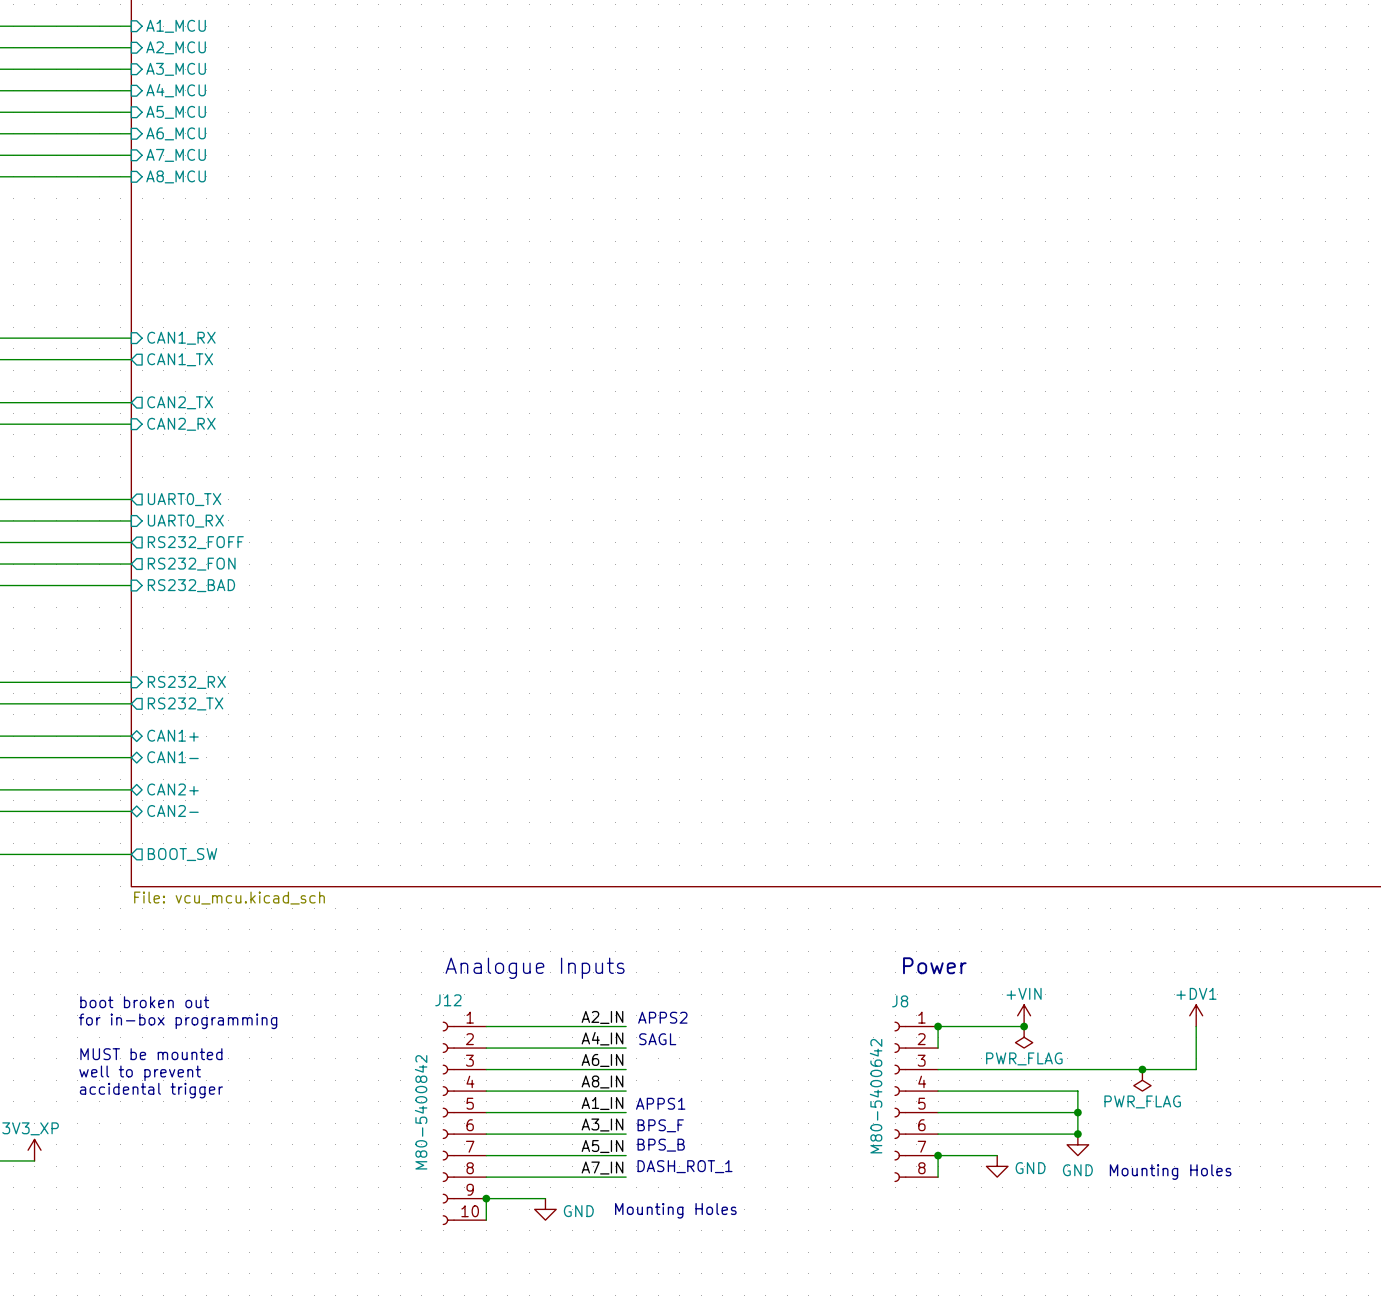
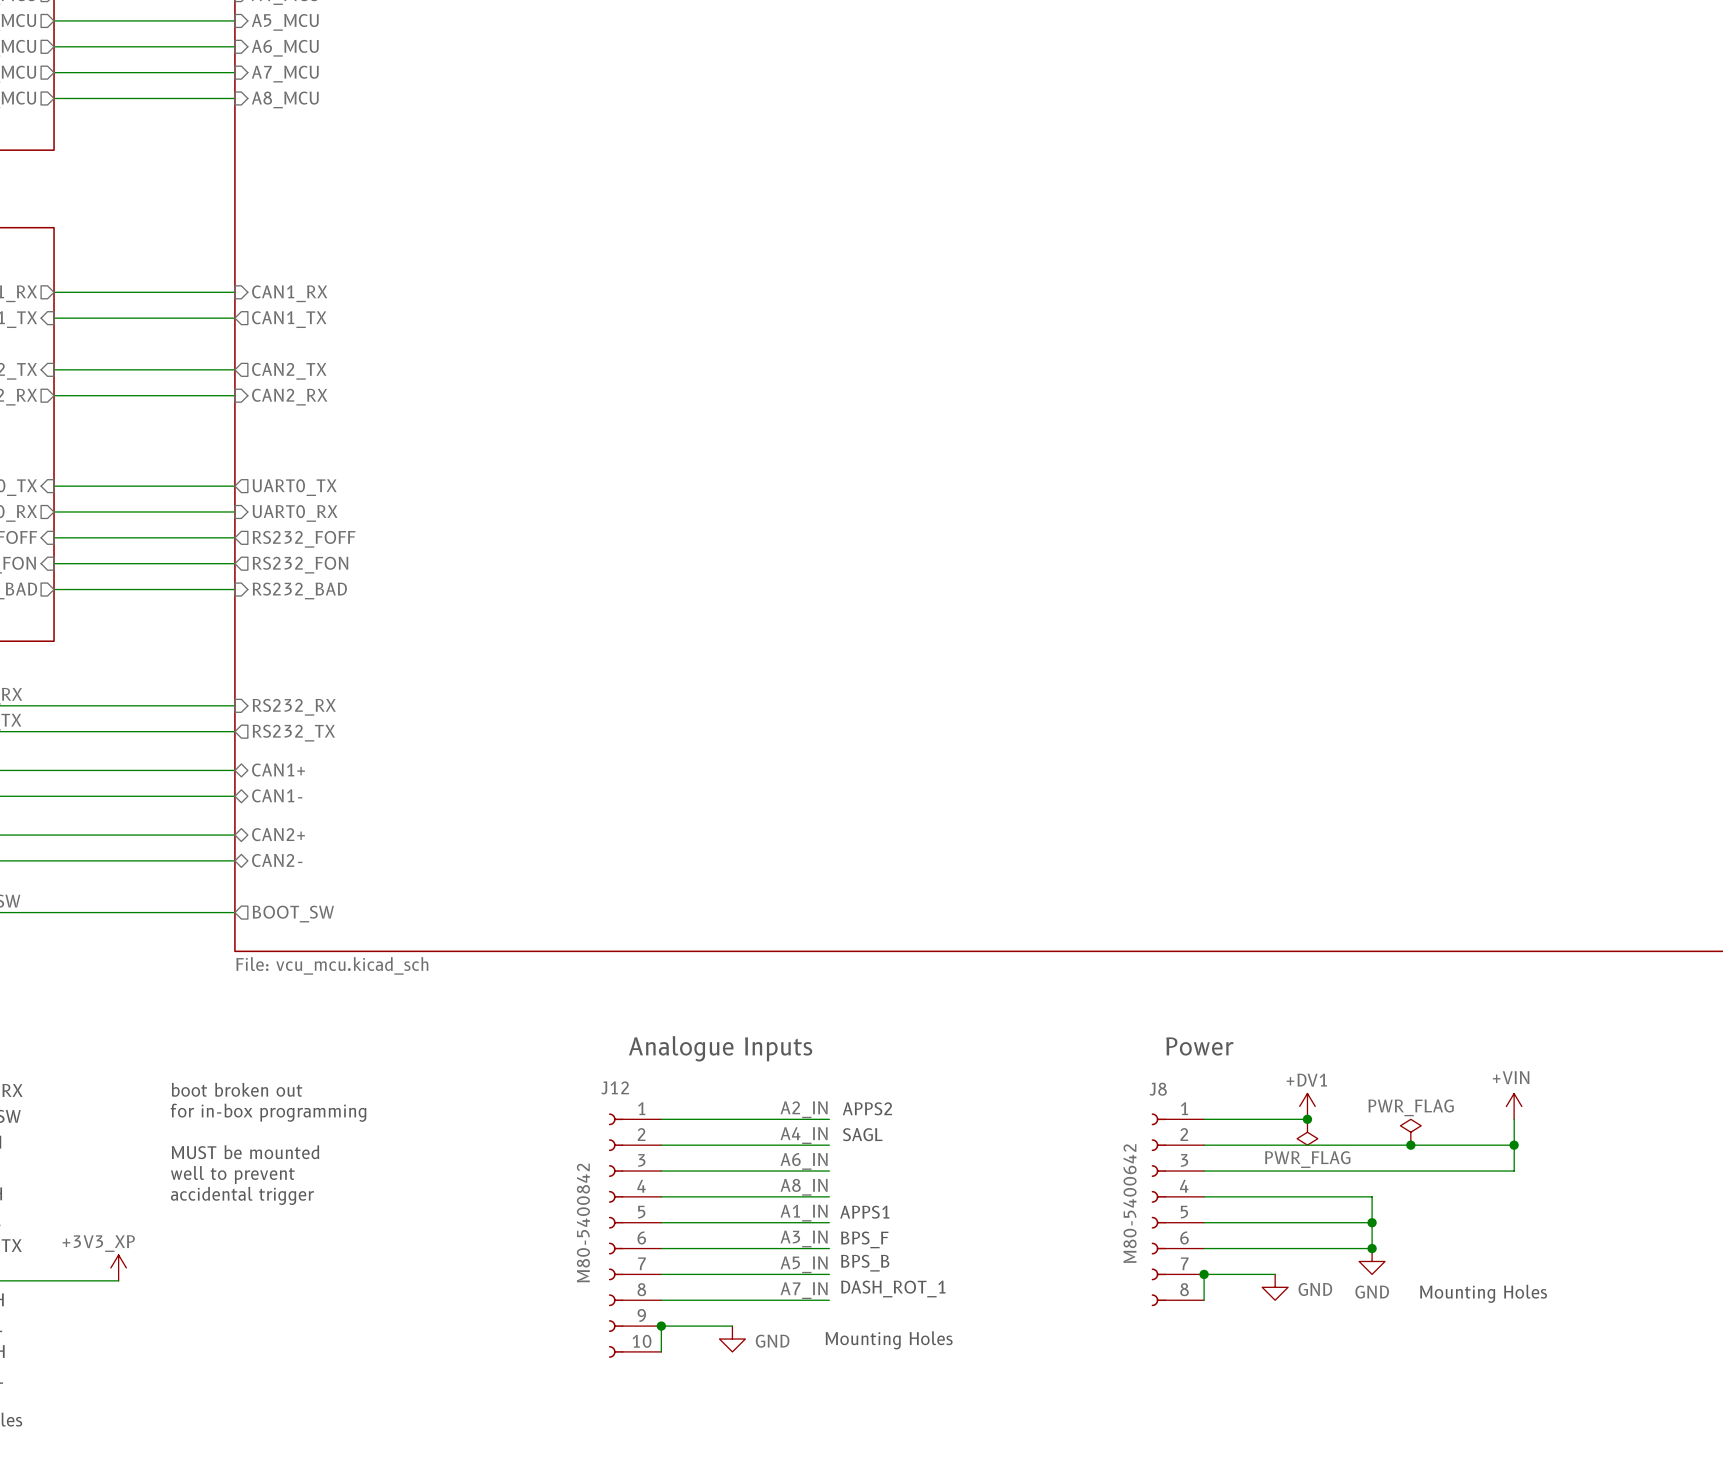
power symbol: +VIN (1024, 1015) -> +DV1 (1307, 1106)
power symbol: +DV1 (1196, 1015) -> +VIN (1514, 1106)
wire: (938, 1026) (938, 1048) -> (1514, 1145) (1204, 1145)
junction: (938, 1026) -> none
junction: none -> (1410, 1145)
junction: none -> (1514, 1145)
junction: (1142, 1069) -> none
power symbol rotation: 0° (1142, 1080) -> 180° (1410, 1132)
power symbol position: PWR_FLAG (1142, 1080) -> PWR_FLAG (1410, 1132)

